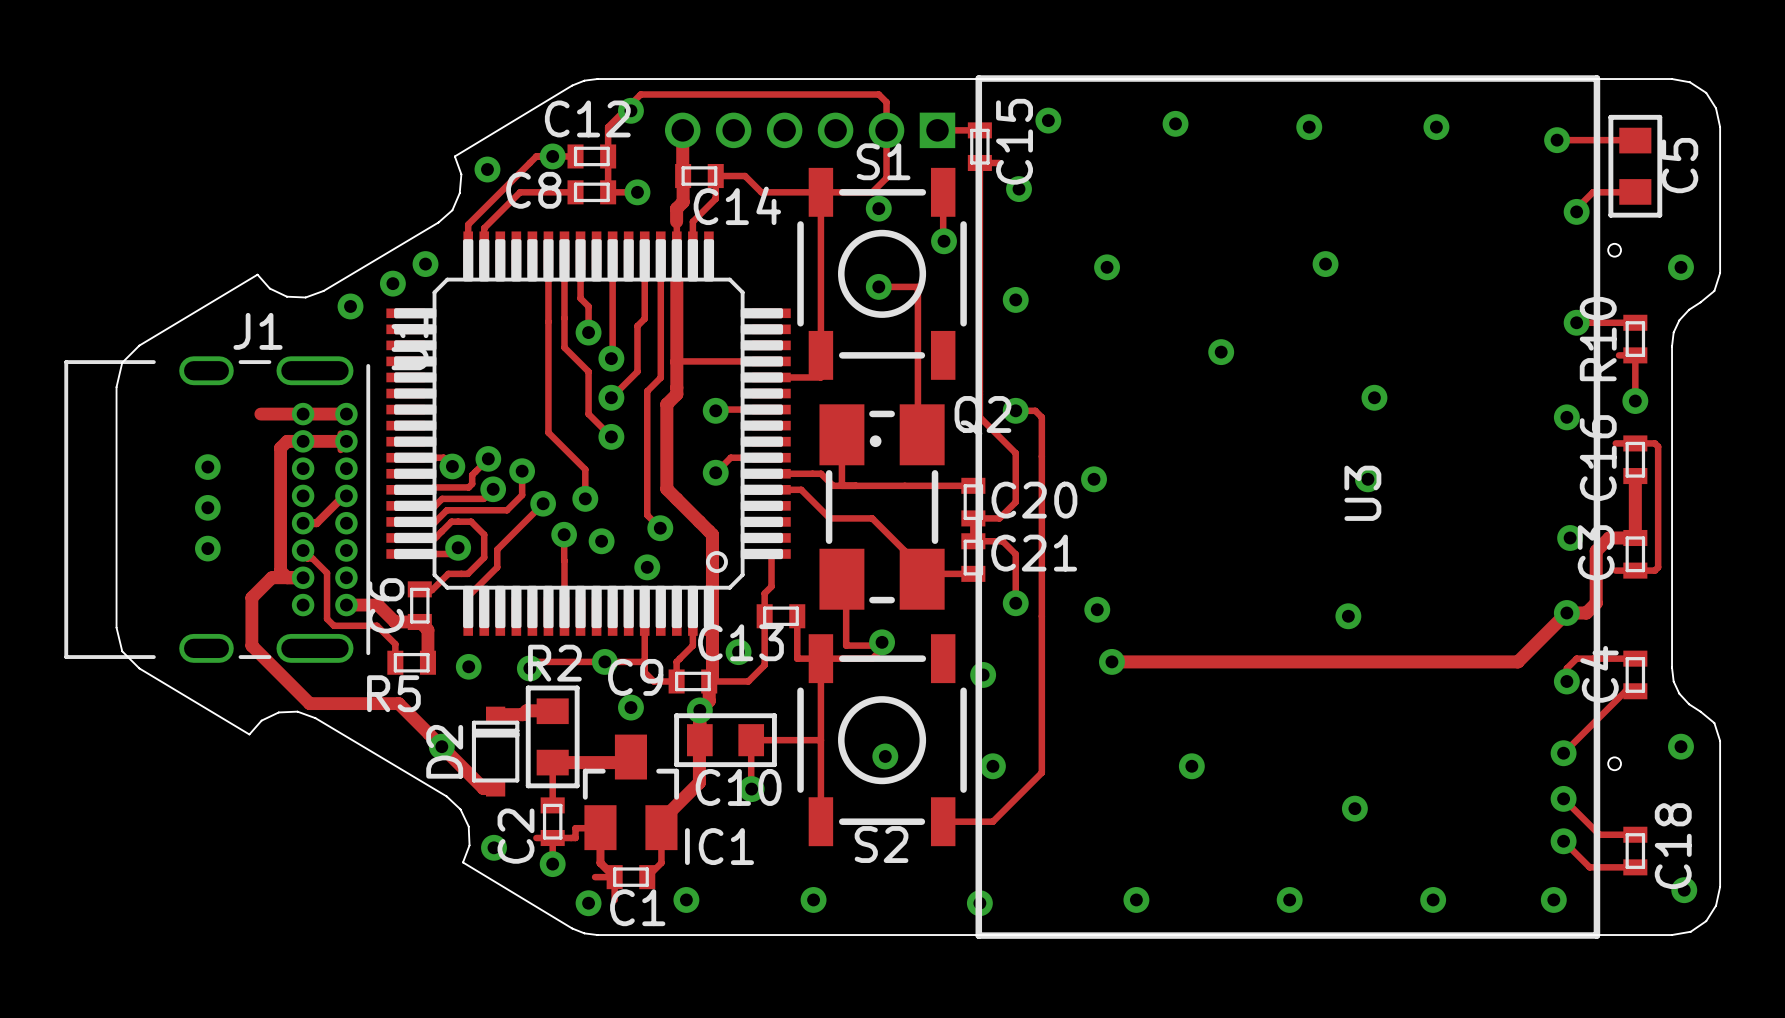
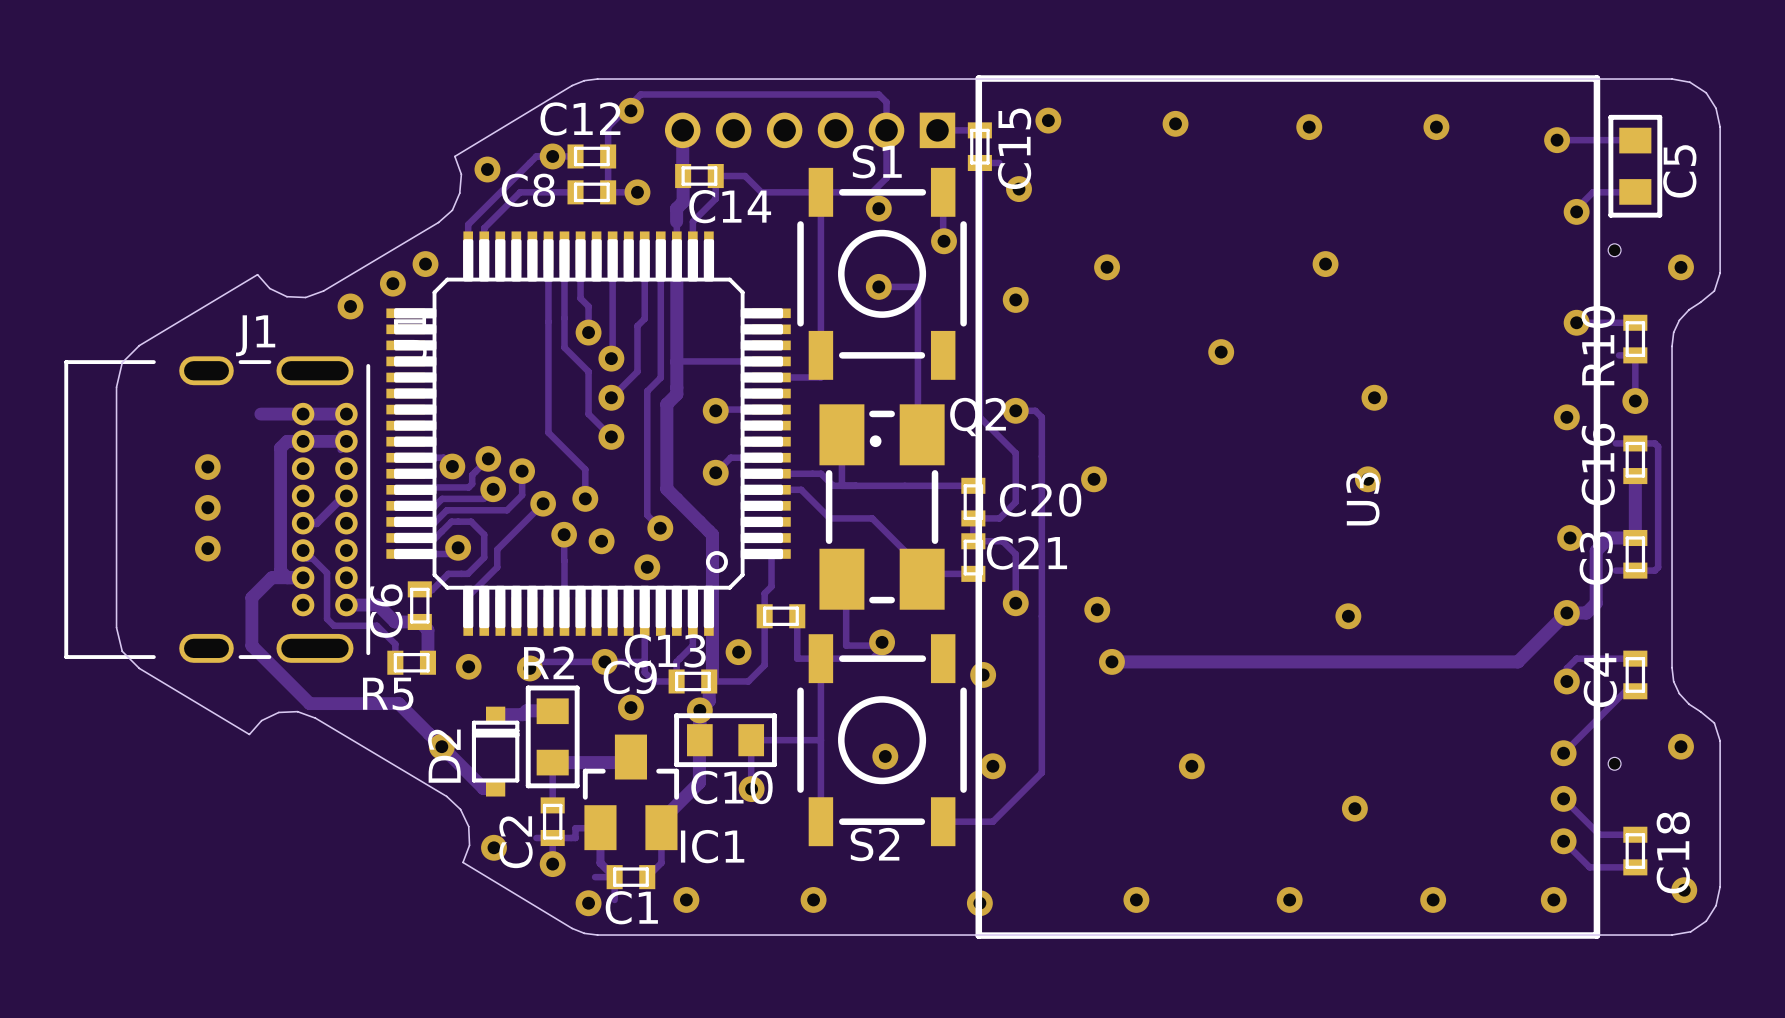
C13 name position: C13 (740, 642) -> C13 (665, 650)

